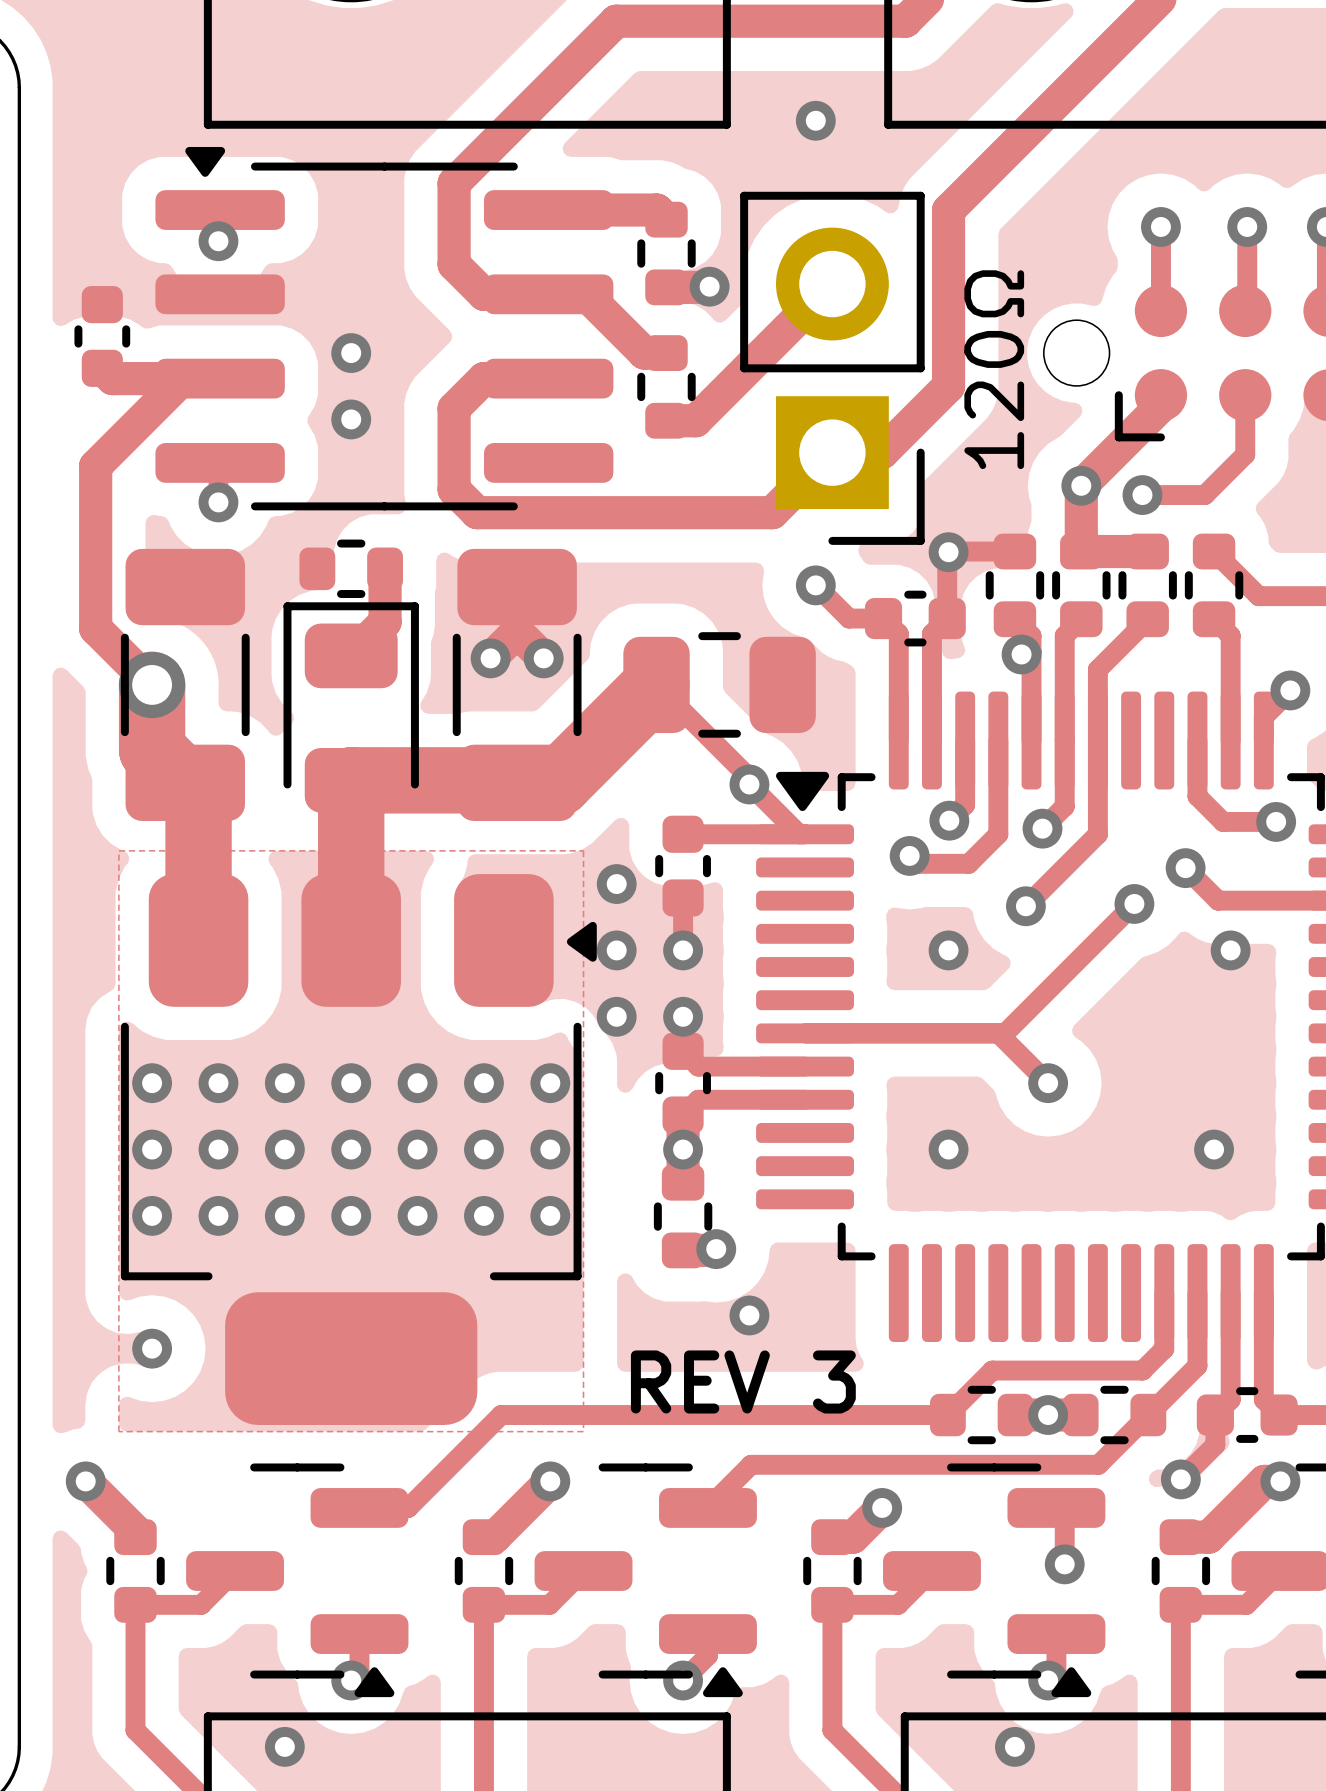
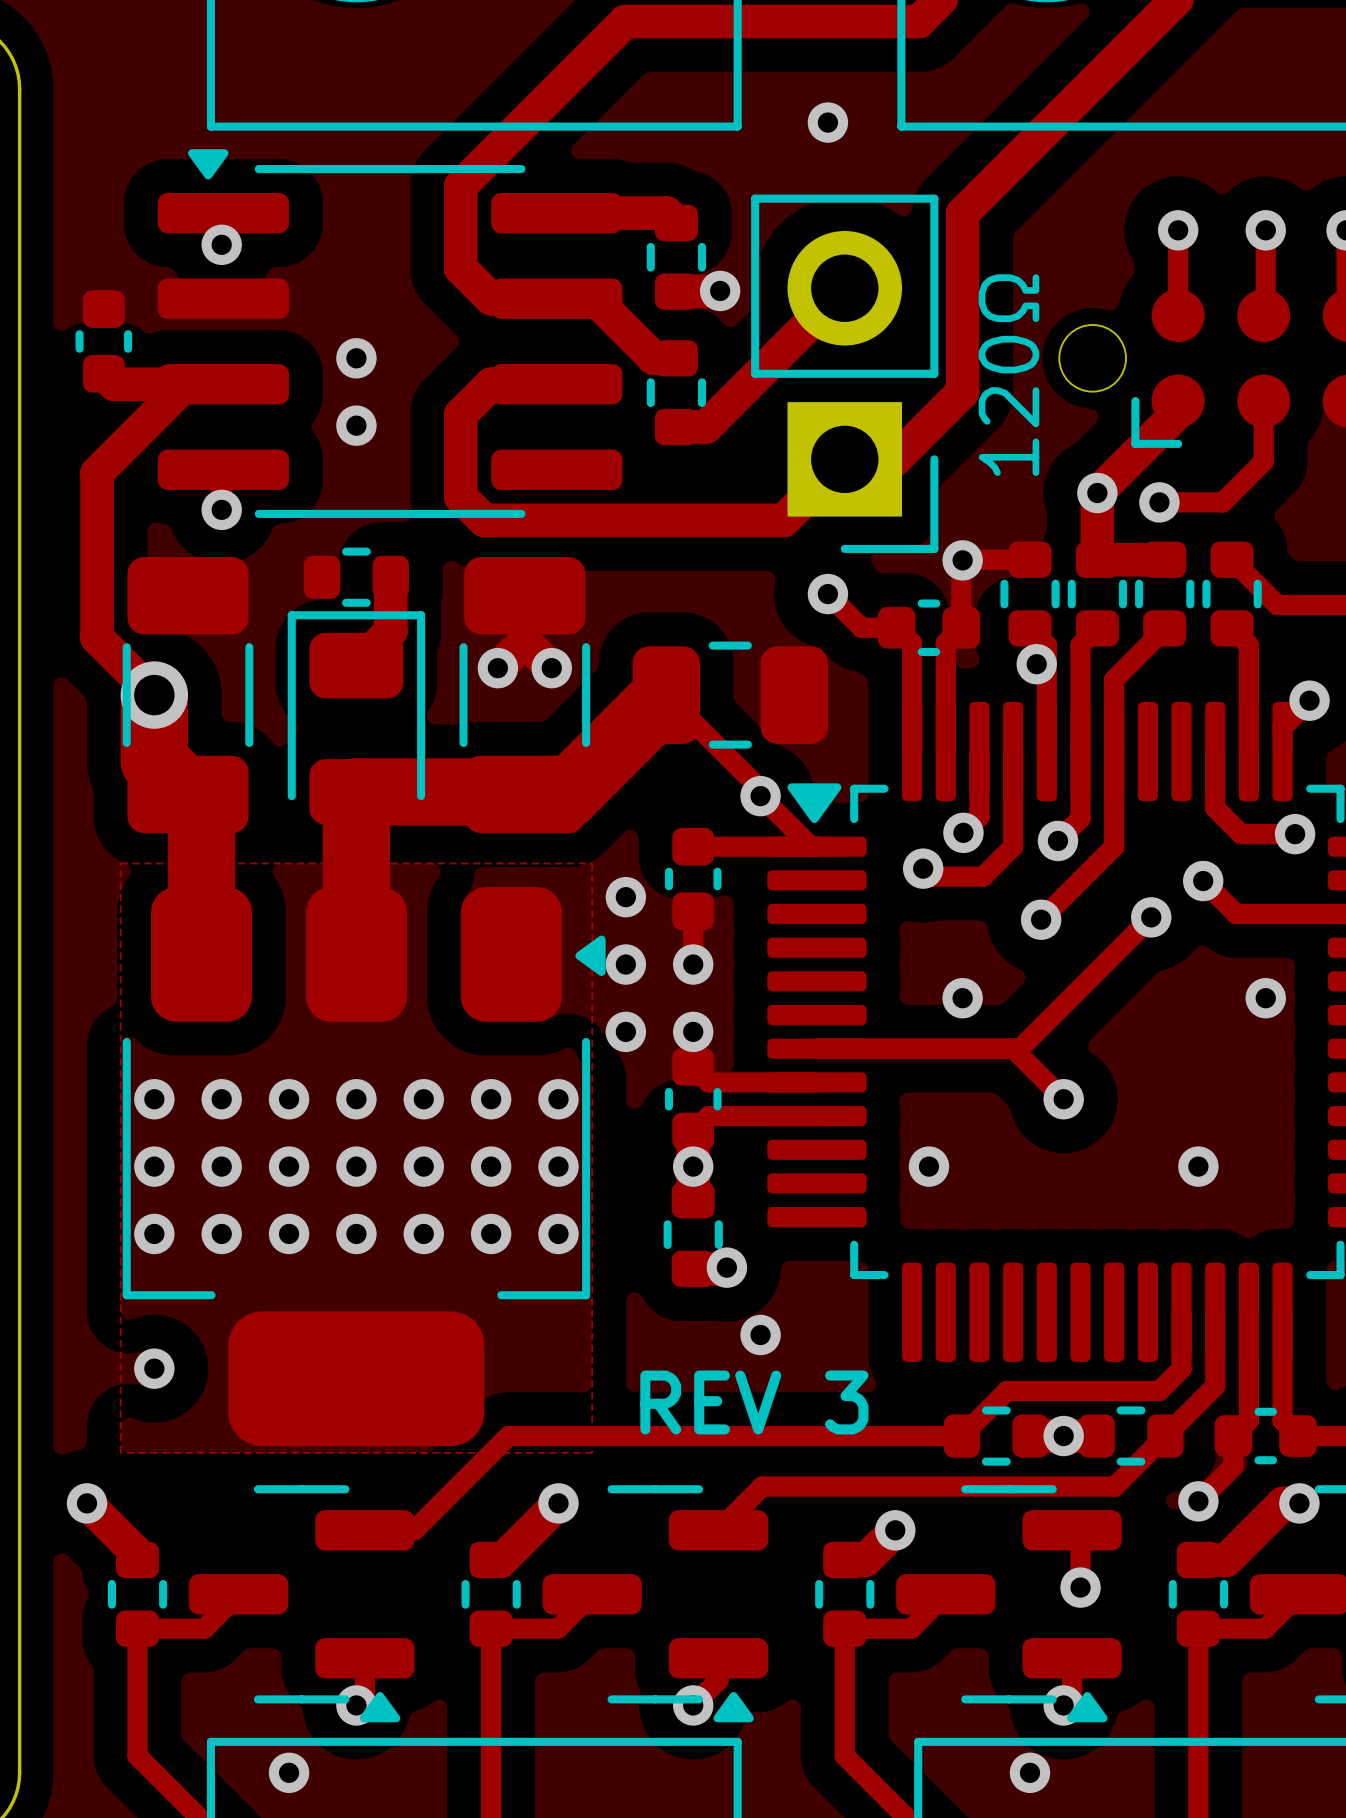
via position: (948, 950) -> (962, 998)
via position: (1230, 950) -> (1265, 998)
via position: (948, 1149) -> (928, 1166)
via position: (1214, 1149) -> (1198, 1166)

